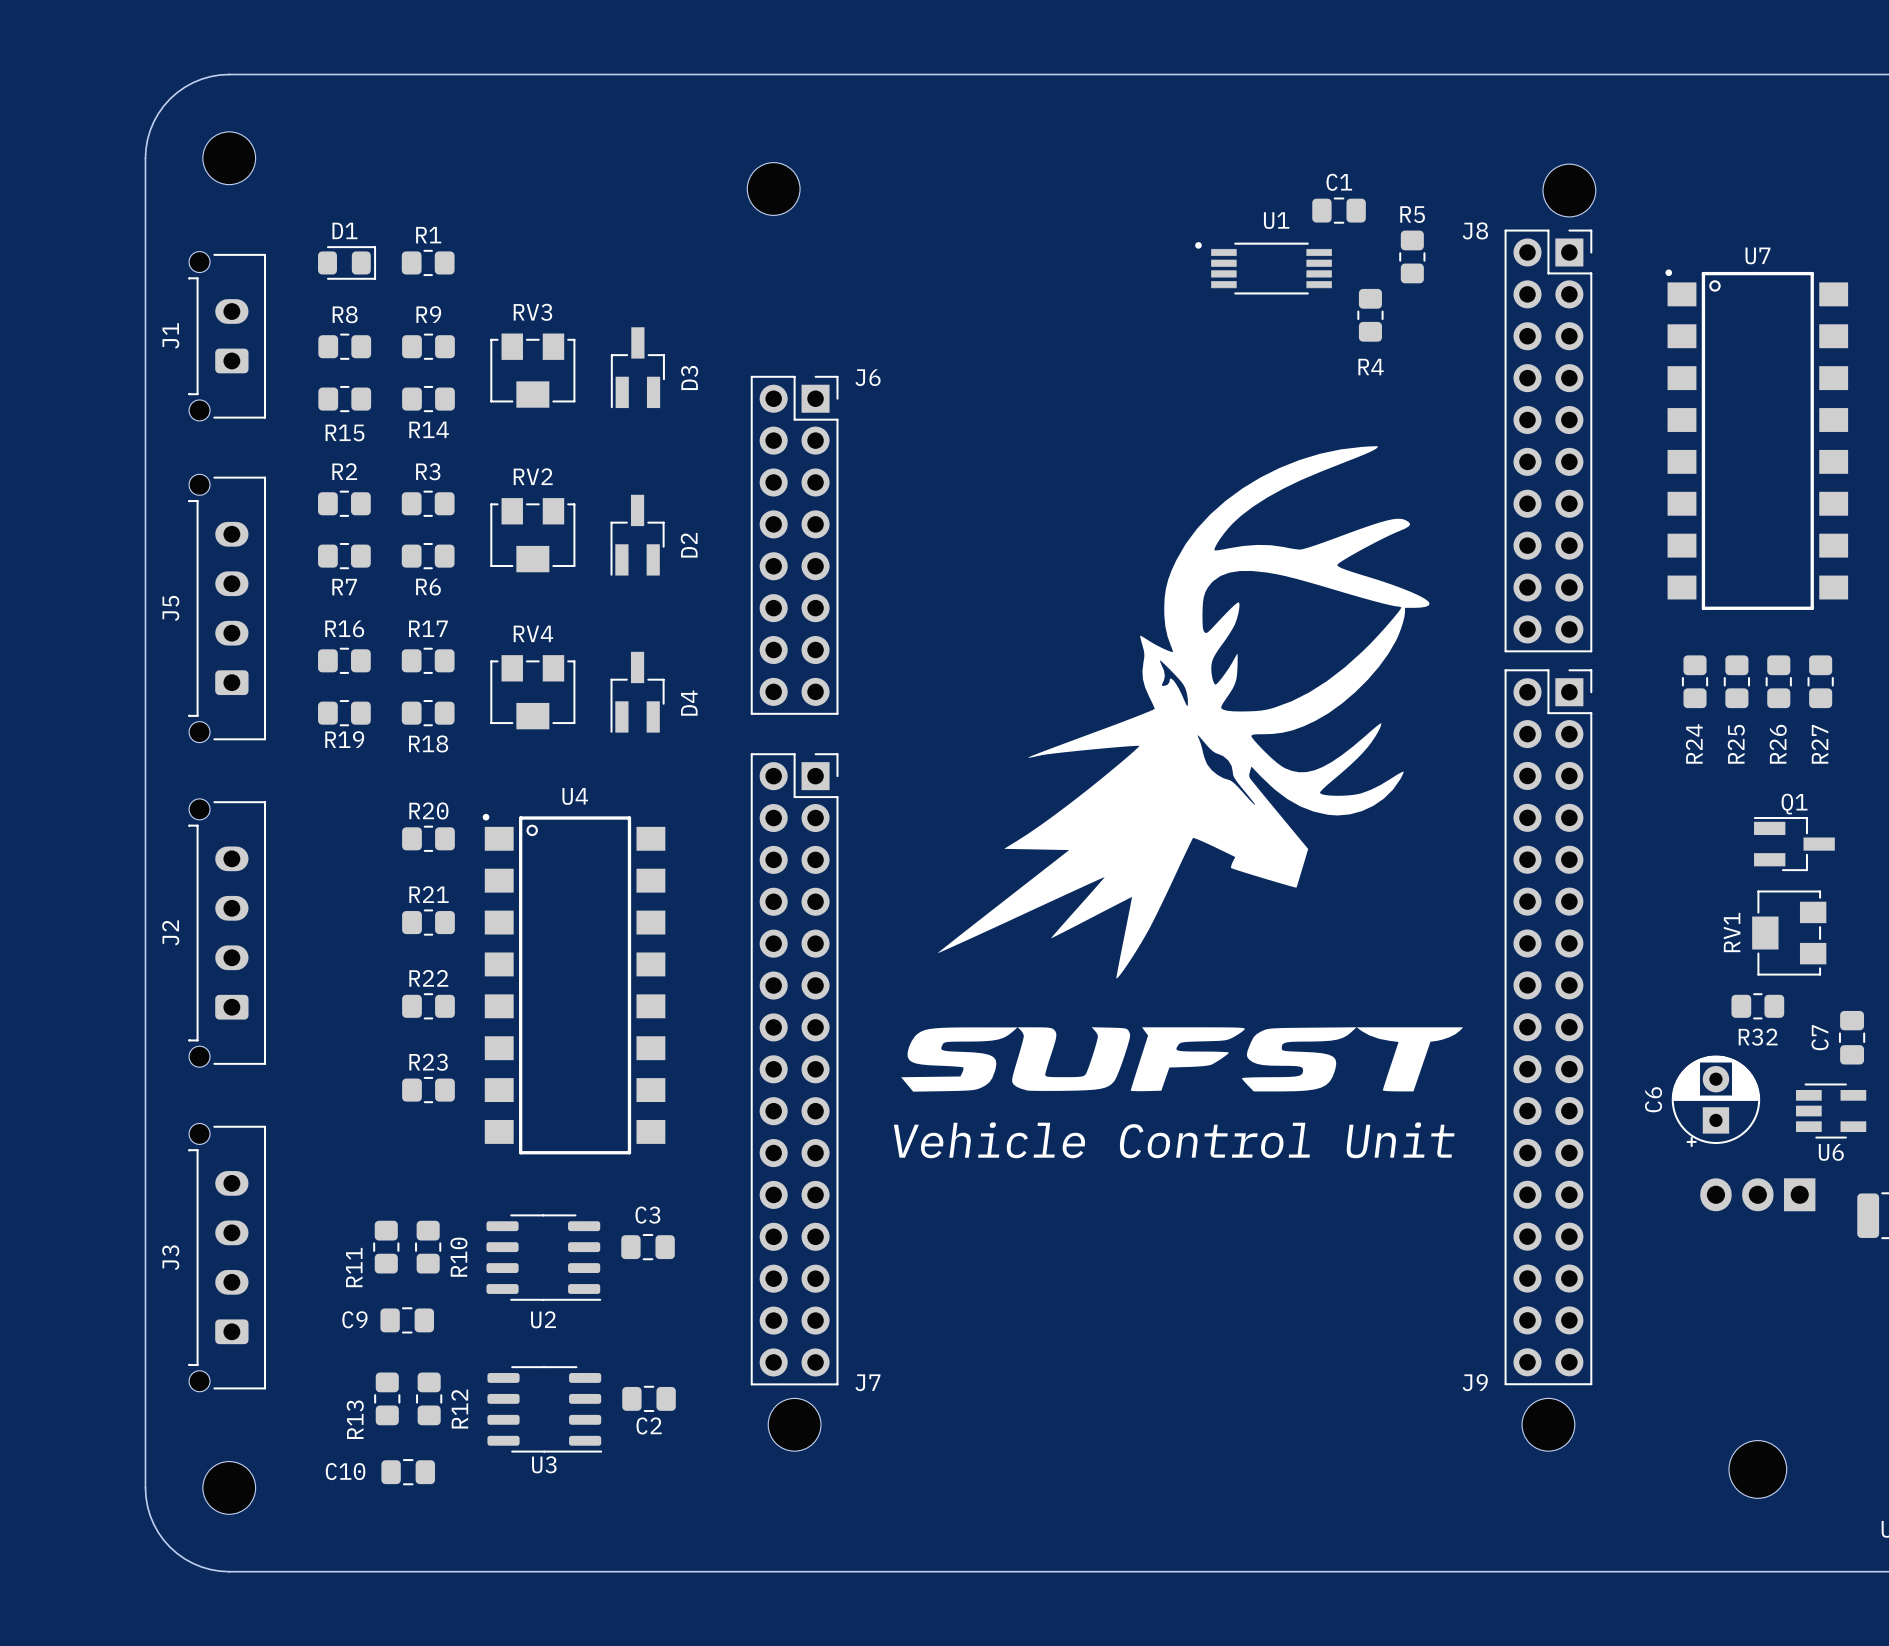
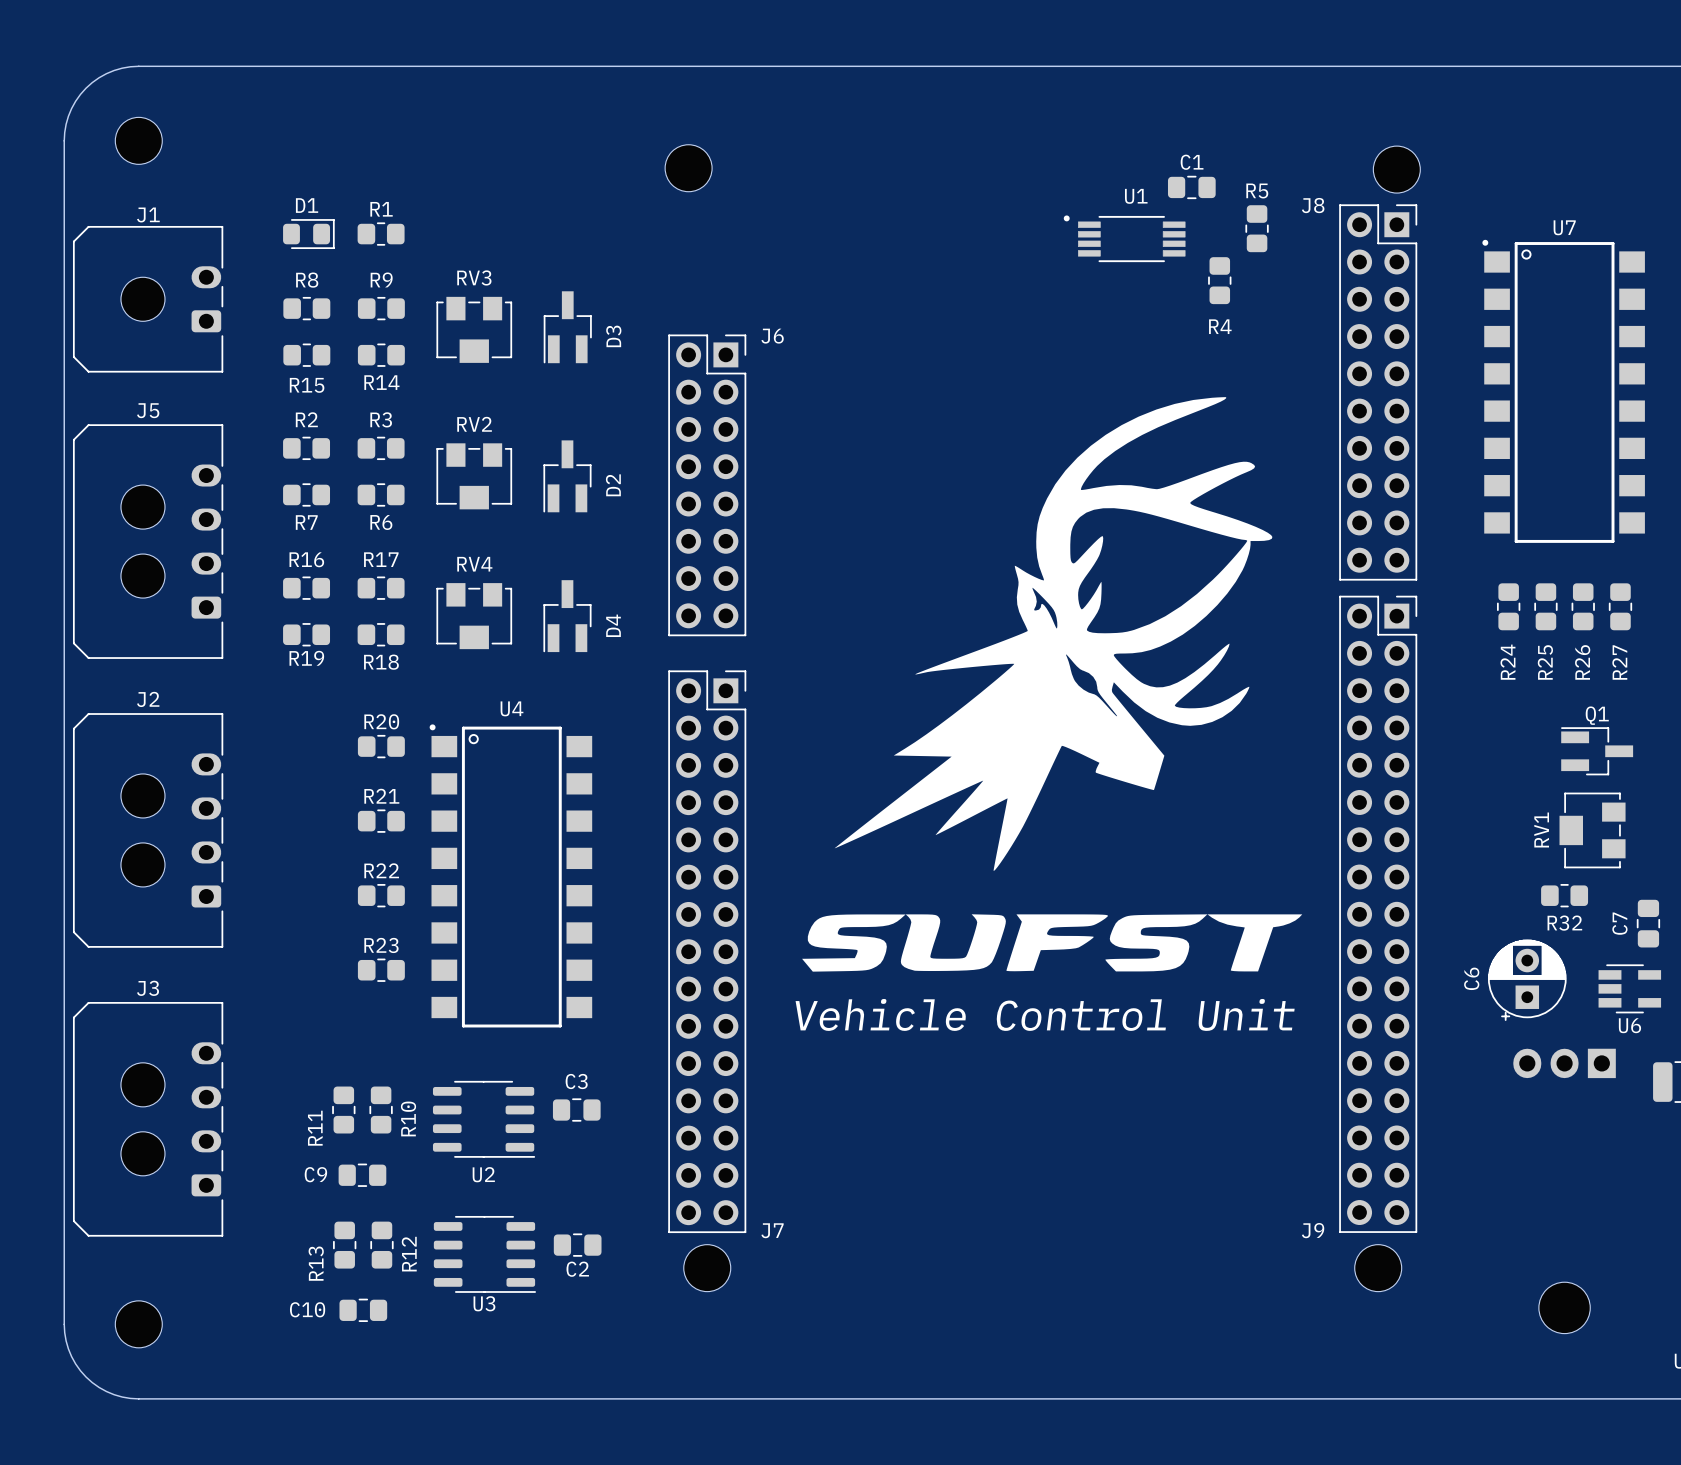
board edge: (229, 74) (210, 76) (192, 82) (170, 99) (158, 113) (150, 130) (145, 158) (146, 1497) (150, 1515) (158, 1532) (177, 1553) (201, 1566) (229, 1571) -> (204, 66) (130, 66) (106, 73) (86, 88) (75, 101) (66, 124) (64, 140) (64, 1332) (68, 1348) (80, 1370) (92, 1382) (106, 1391) (130, 1398) (204, 1398)
part position: (229, 158) -> (138, 140)
J1 footprint: [188, 251, 267, 421] -> [72, 225, 224, 373]
J1 name position: J1 (170, 335) -> J1 (148, 214)
J5 footprint: [188, 474, 267, 743] -> [72, 424, 224, 659]
J5 name position: J5 (170, 608) -> J5 (148, 410)
J2 footprint: [188, 798, 267, 1068] -> [72, 713, 224, 948]
J2 name position: J2 (170, 932) -> J2 (148, 699)
J3 footprint: [188, 1123, 267, 1392] -> [72, 1002, 224, 1237]
J3 name position: J3 (170, 1257) -> J3 (148, 988)
part position: (229, 1487) -> (138, 1324)

